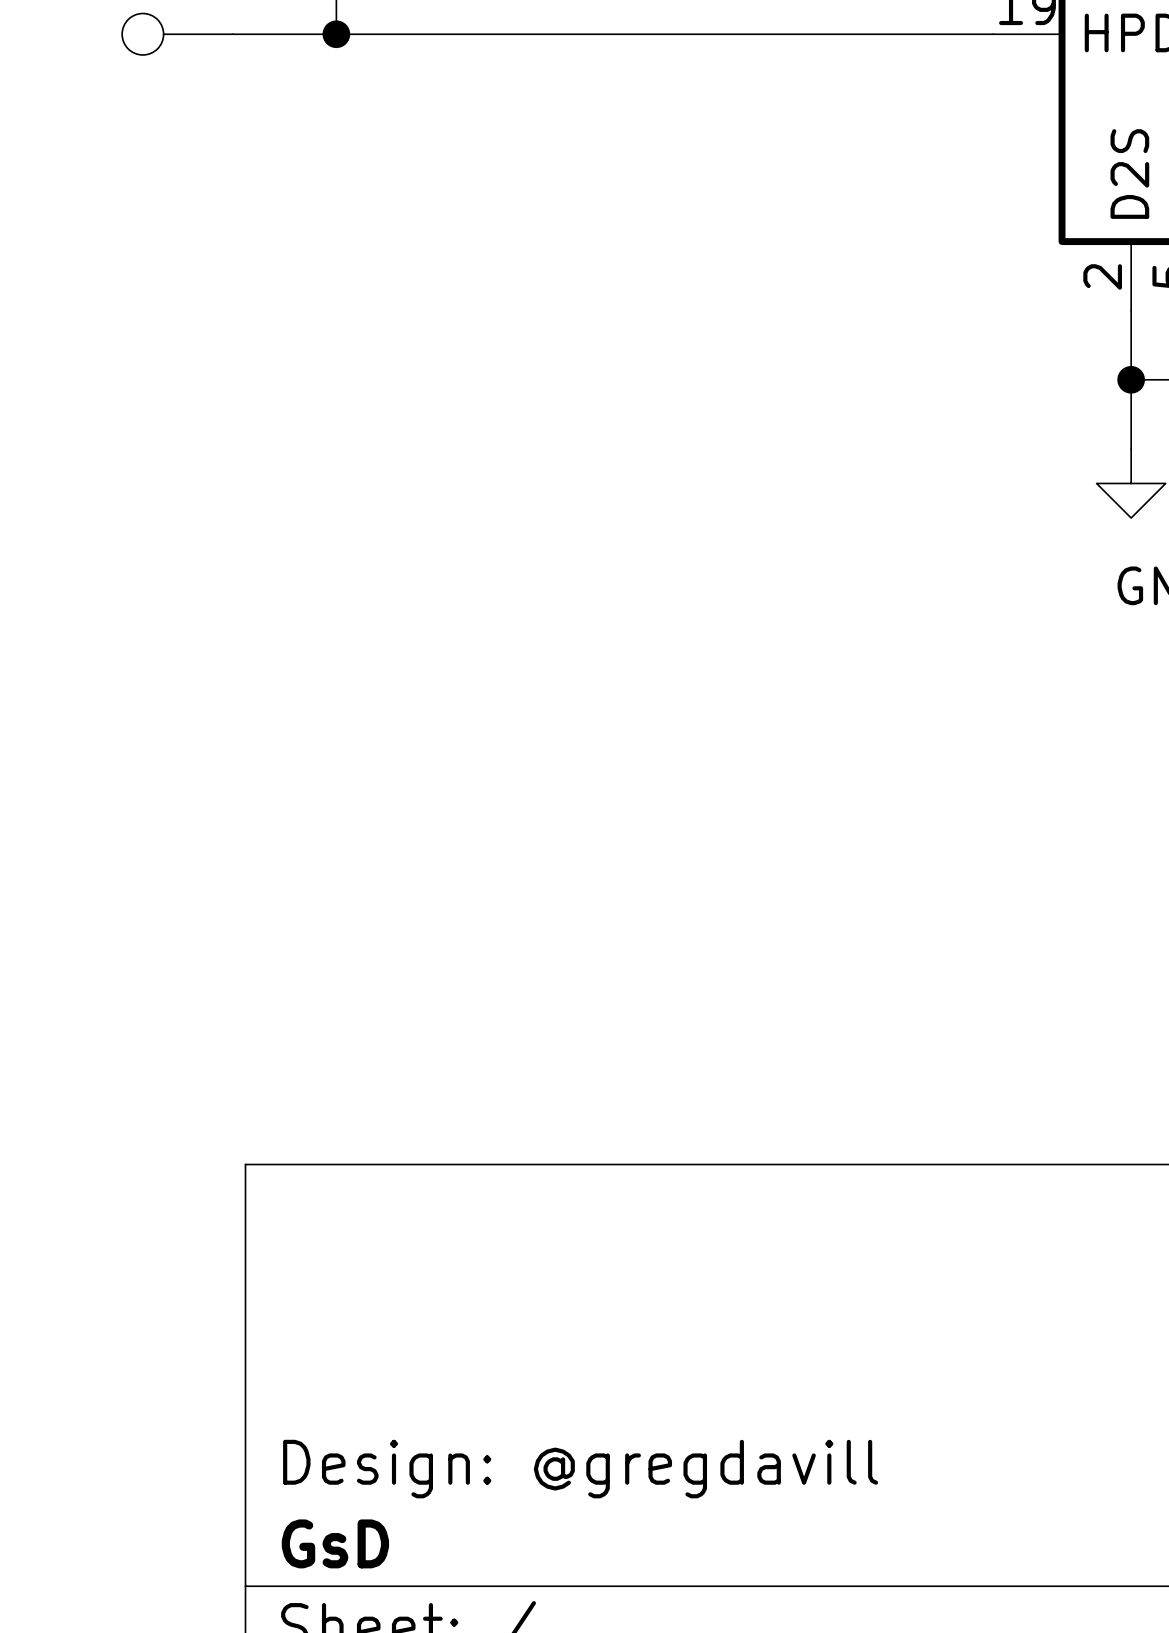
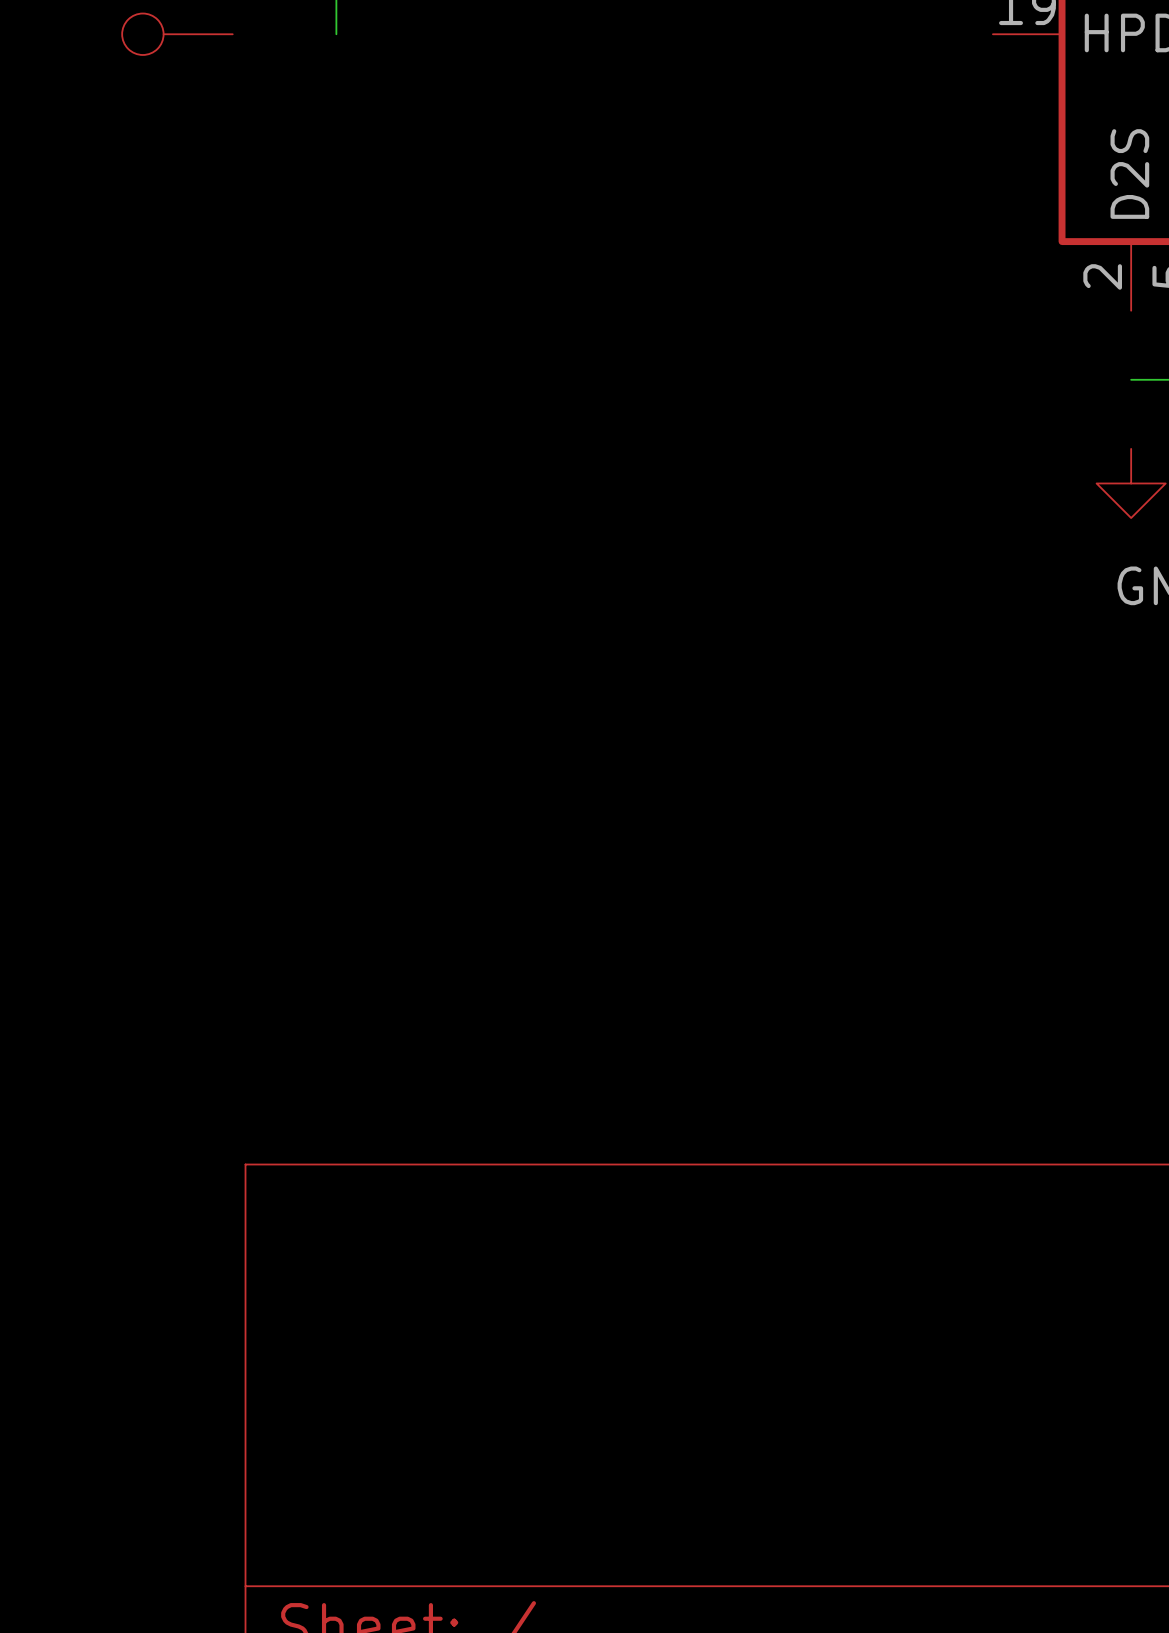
wire: (232, 34) (992, 34) -> none
junction: (336, 34) -> none
wire: (1131, 310) (1131, 448) -> none
junction: (1131, 379) -> none
title block: Design: @gregdavill (580, 1469) -> none
title block: GsD (335, 1543) -> none

